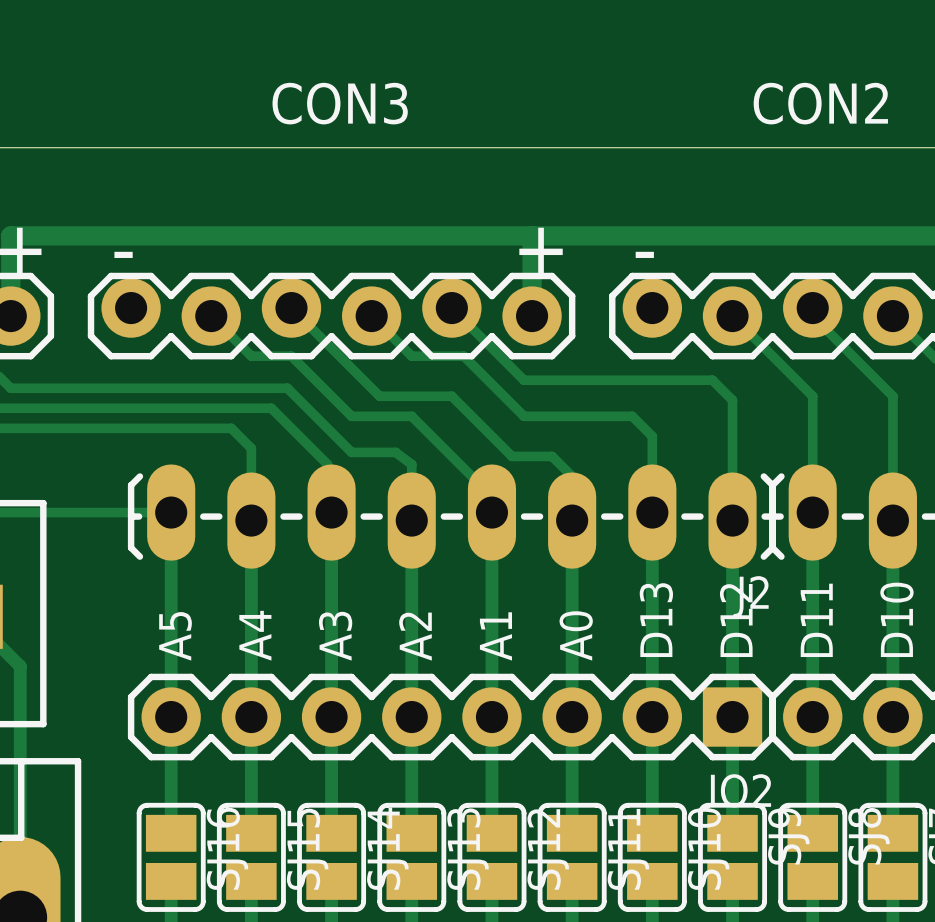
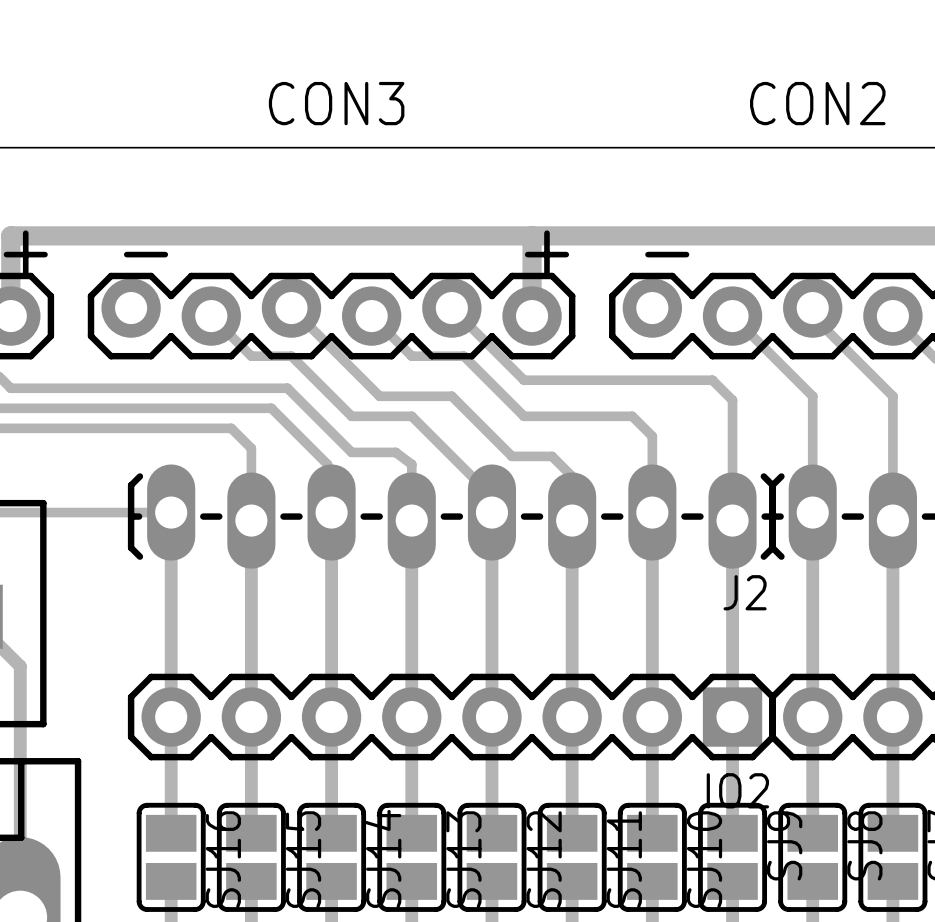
text: D10 (896, 619) -> none
text: D13 (656, 620) -> none
text: D12 (736, 620) -> none
text: D11 (816, 620) -> none
text: A4 (255, 635) -> none
text: A0 (576, 635) -> none
text: A5 (175, 636) -> none
text: A3 (335, 636) -> none
text: A2 (415, 636) -> none
text: A1 (495, 636) -> none

